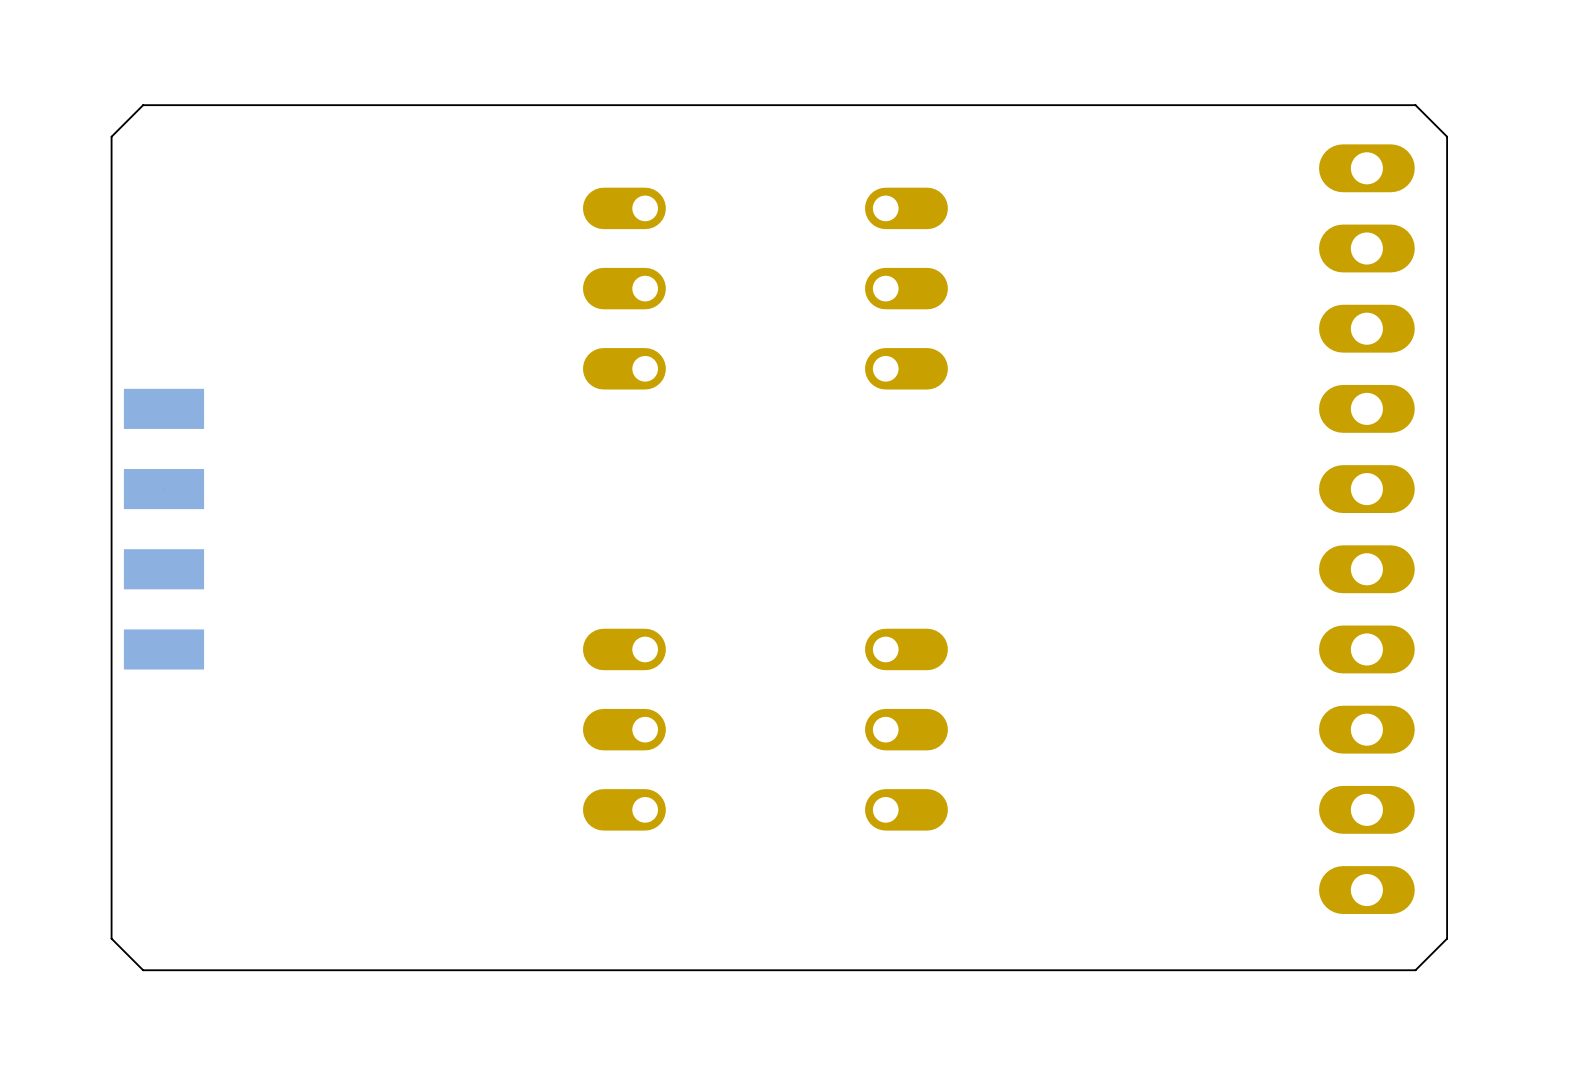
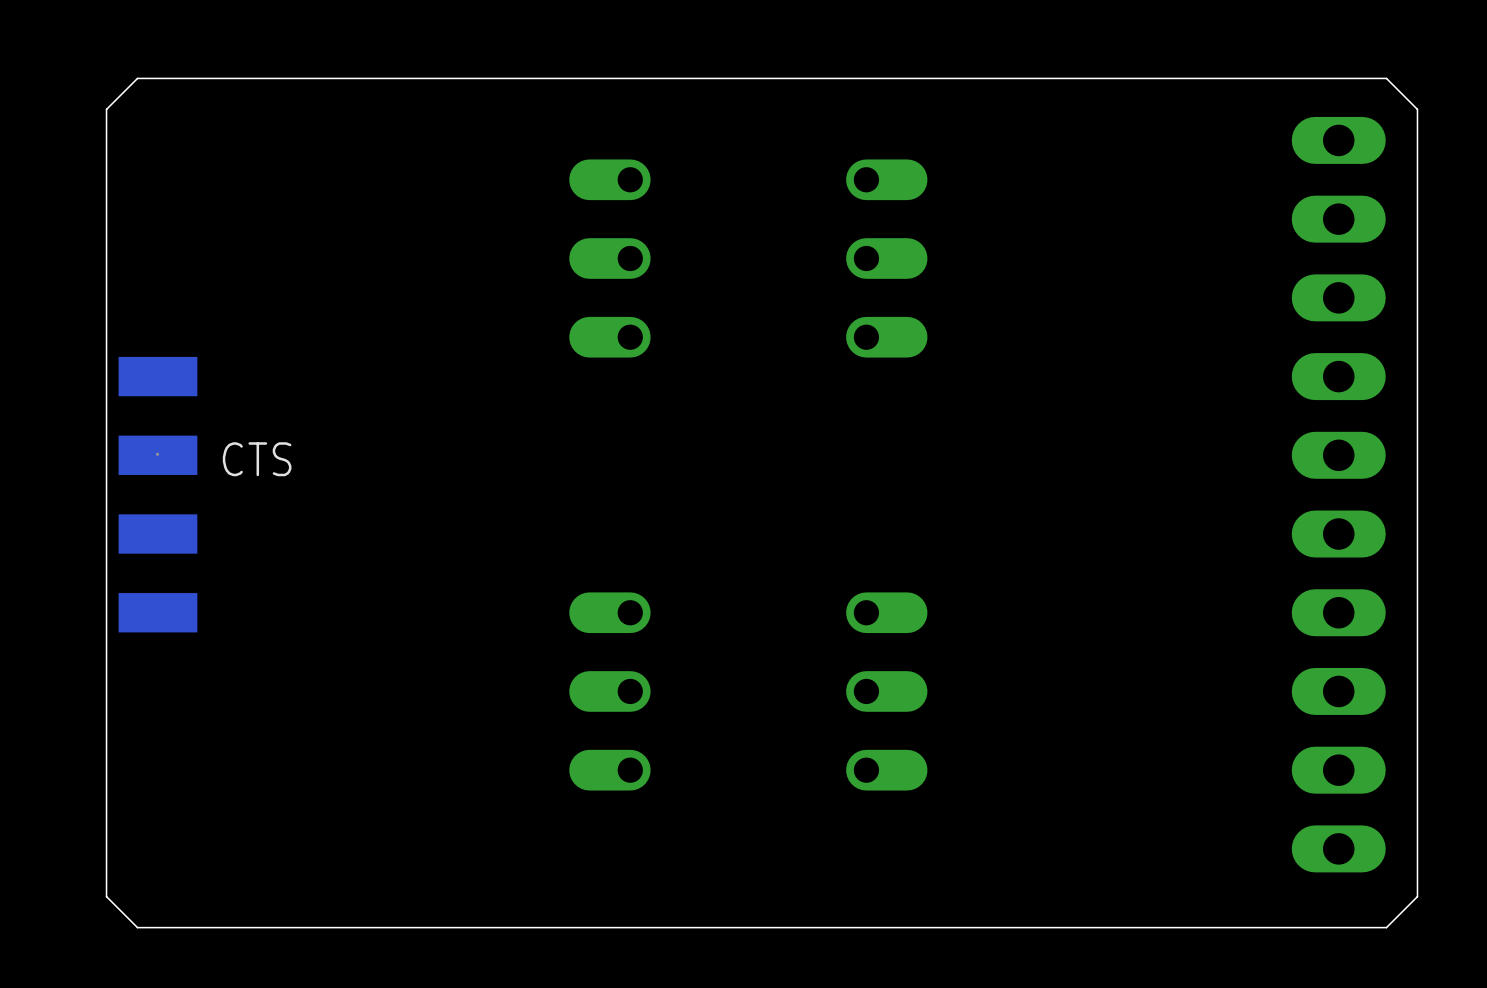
text: none -> CTS (257, 459)

